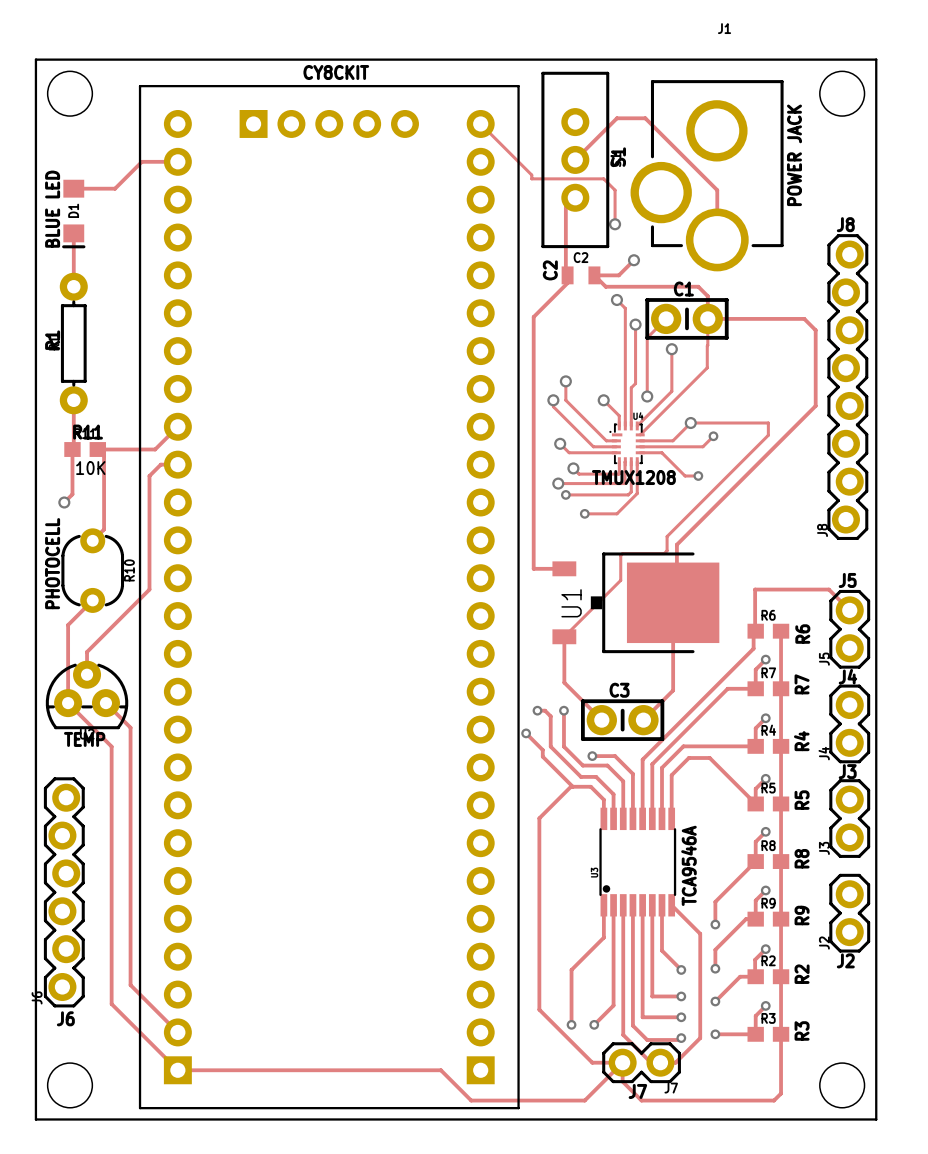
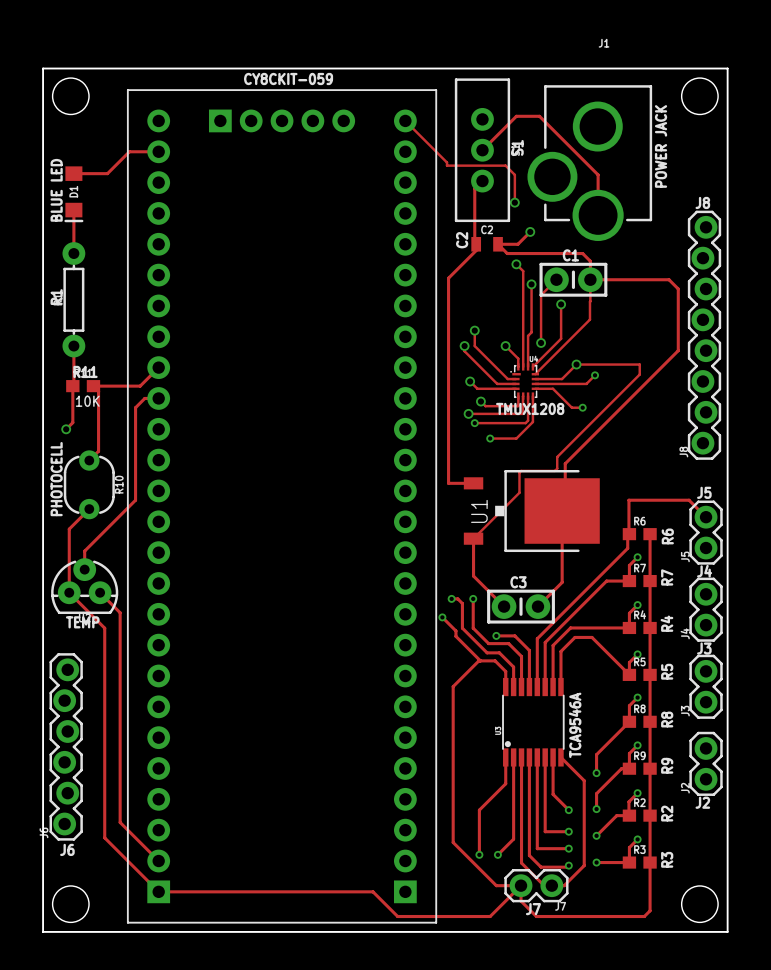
text: CY8CKIT (336, 72) -> CY8CKIT-059 (288, 78)

